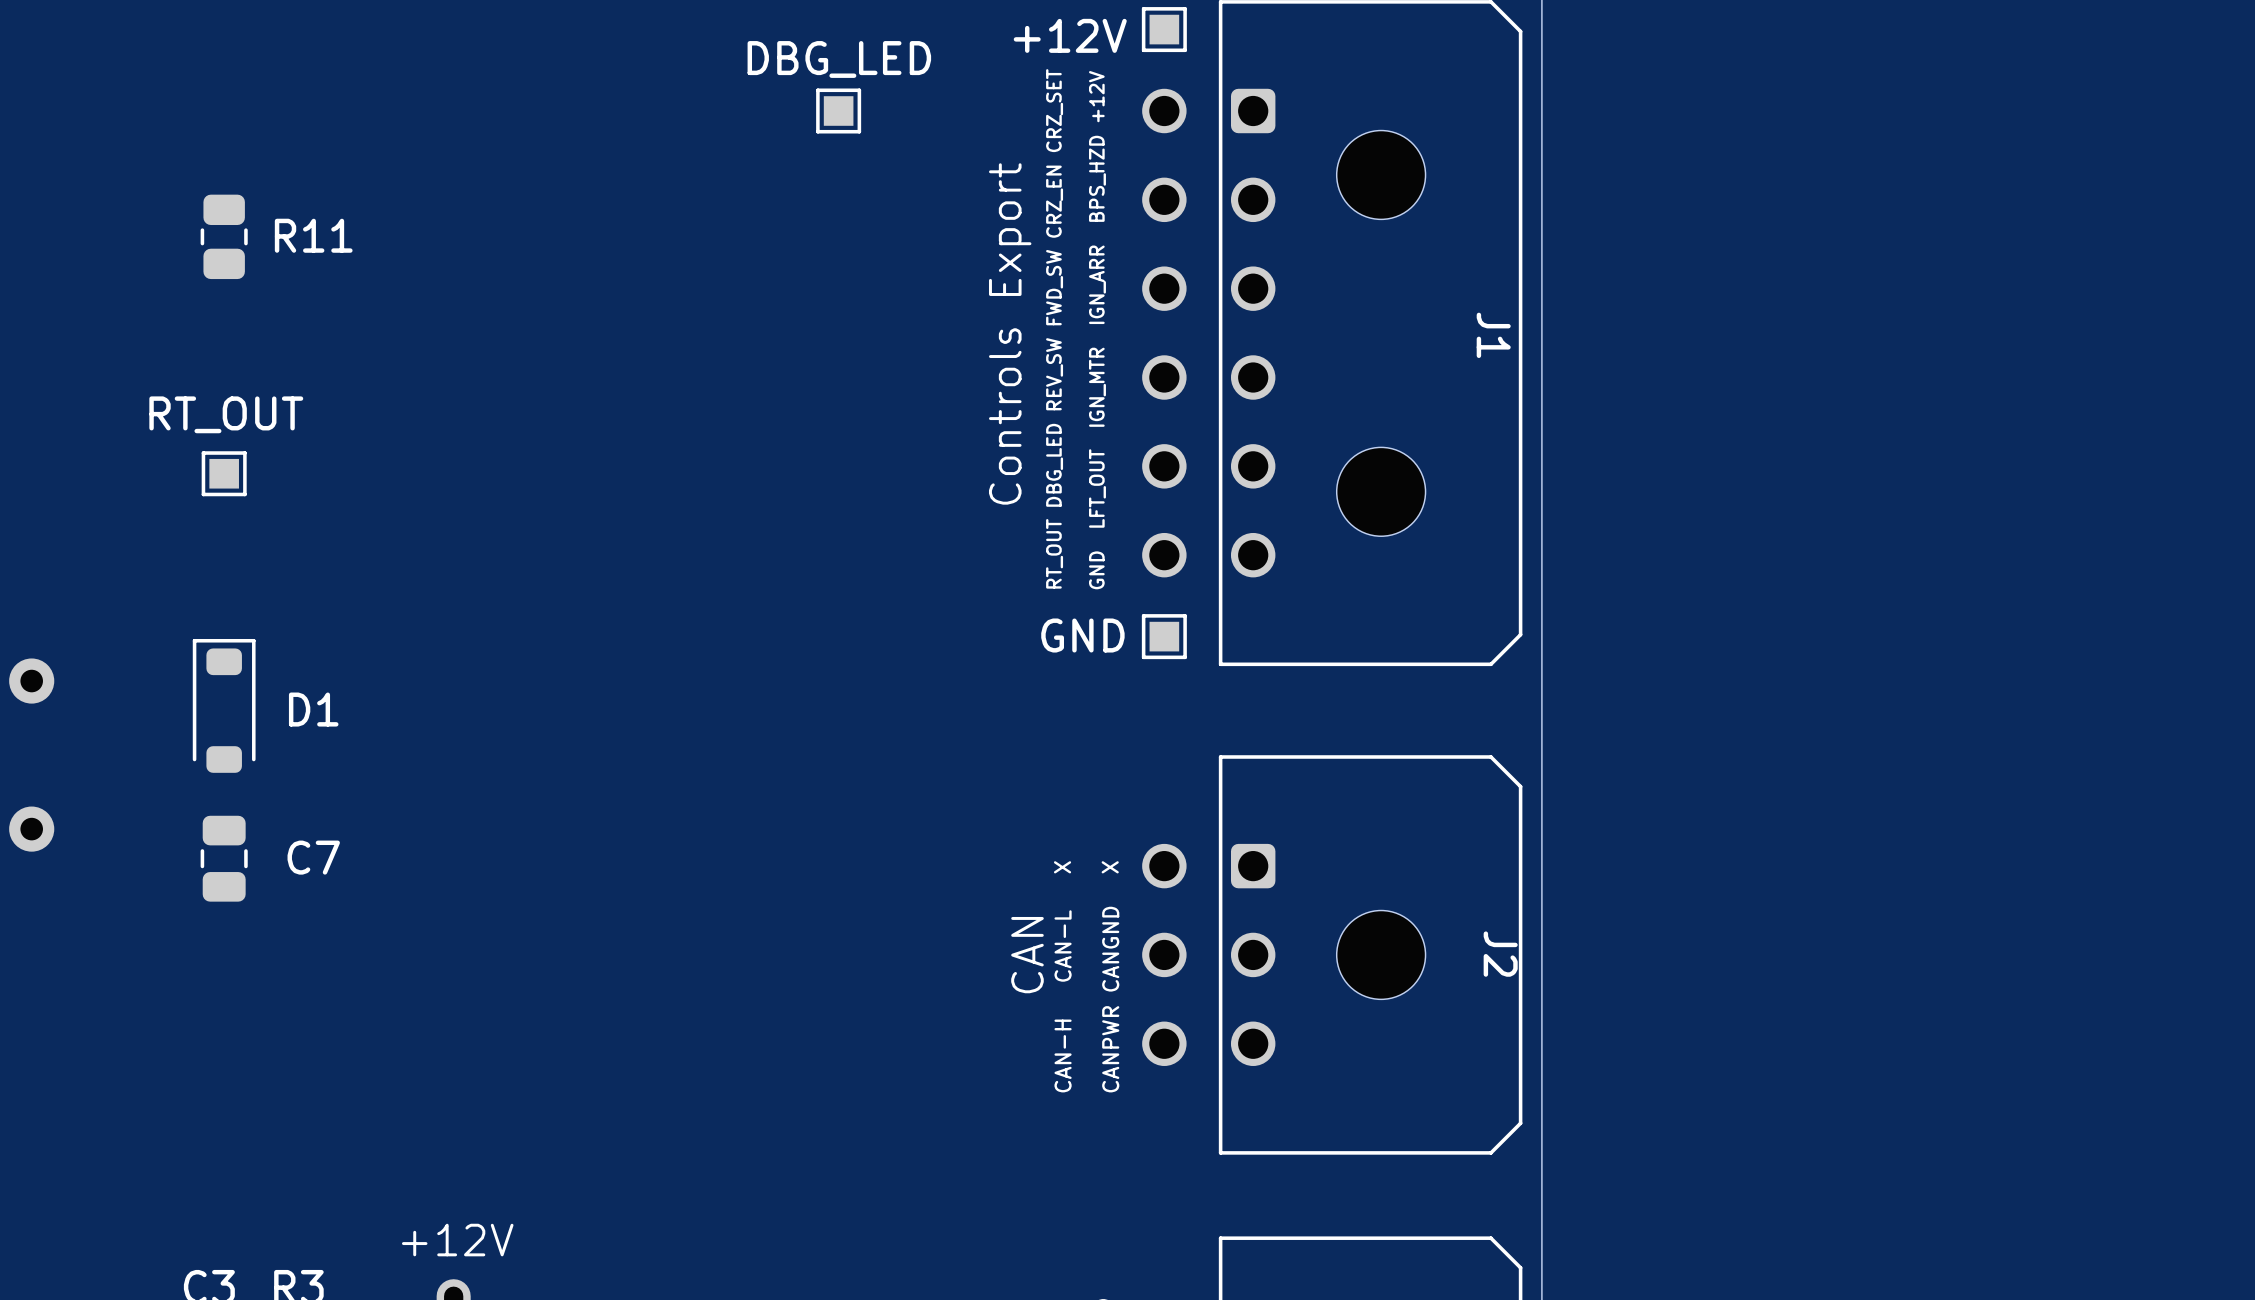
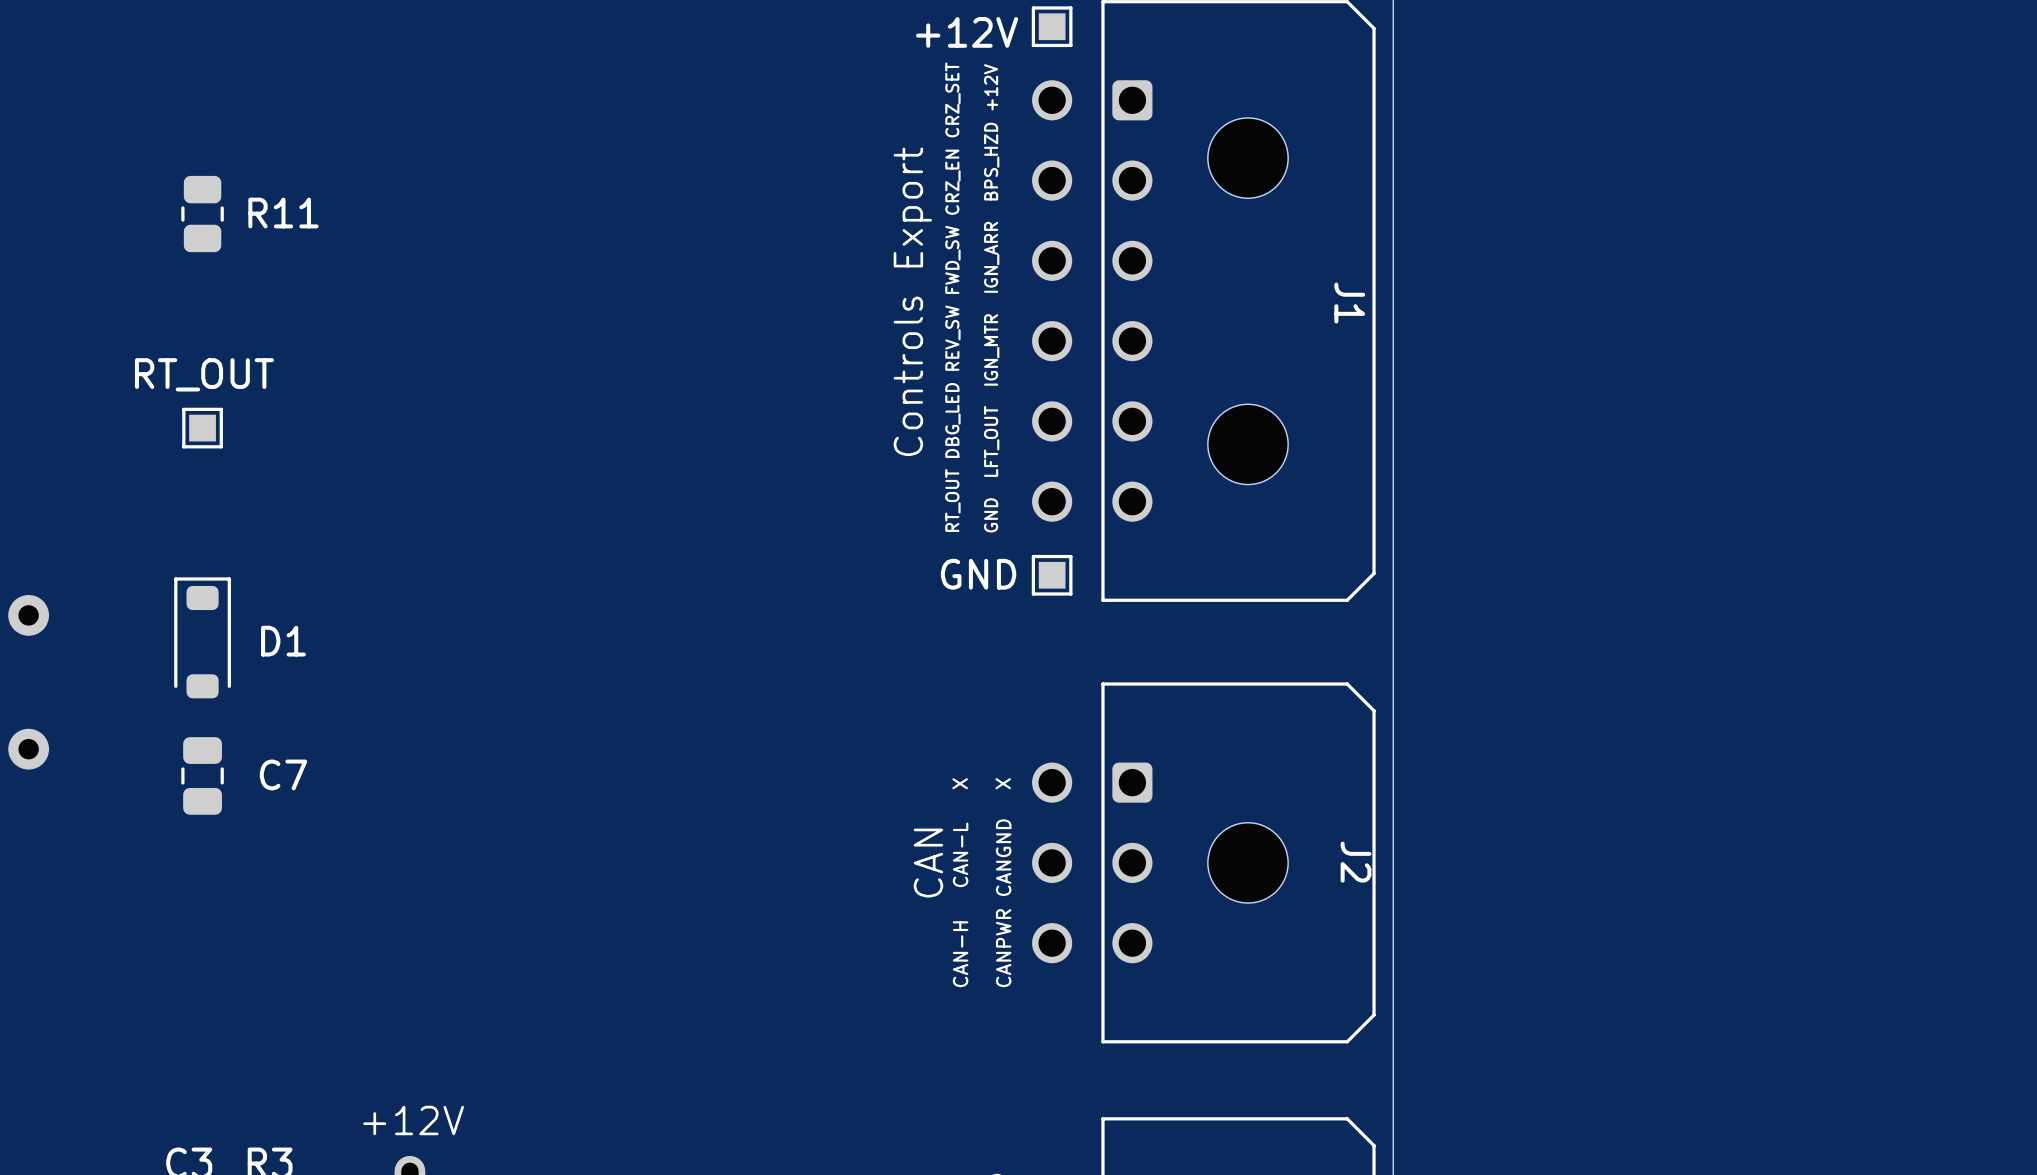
DBG_LED: (838, 111) -> none

